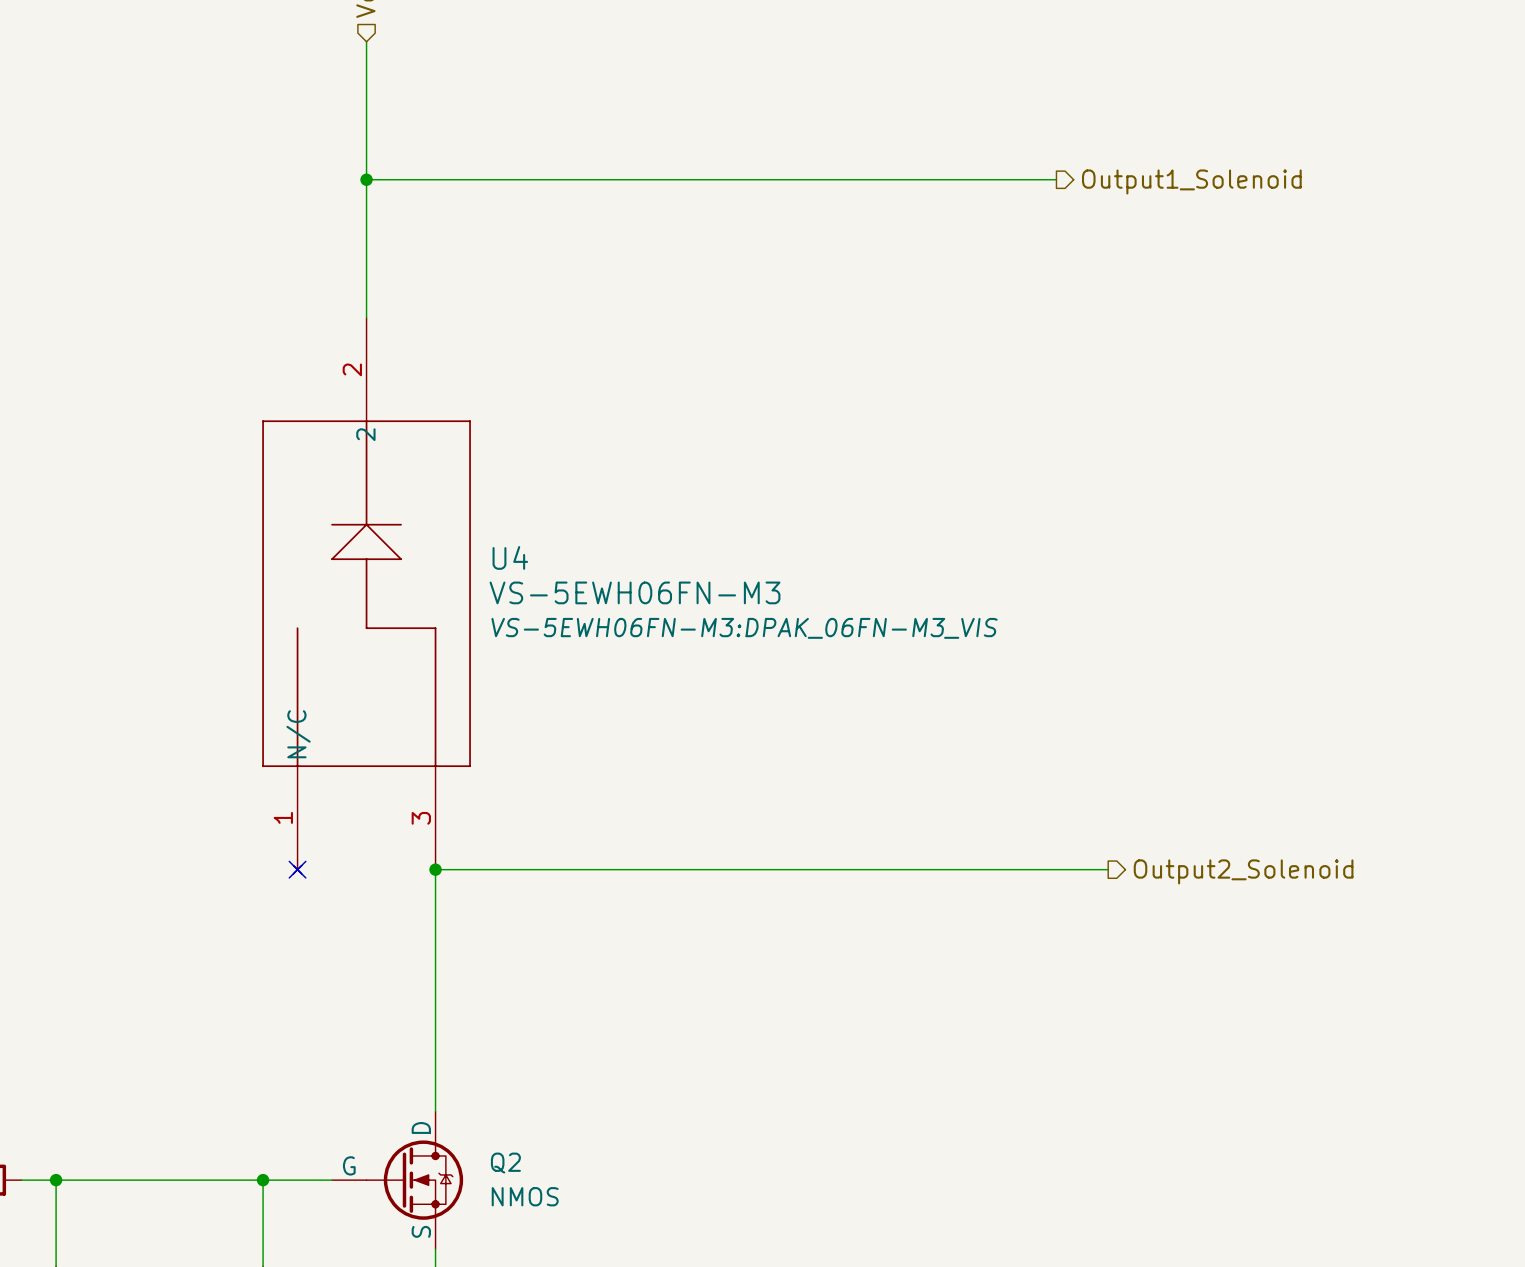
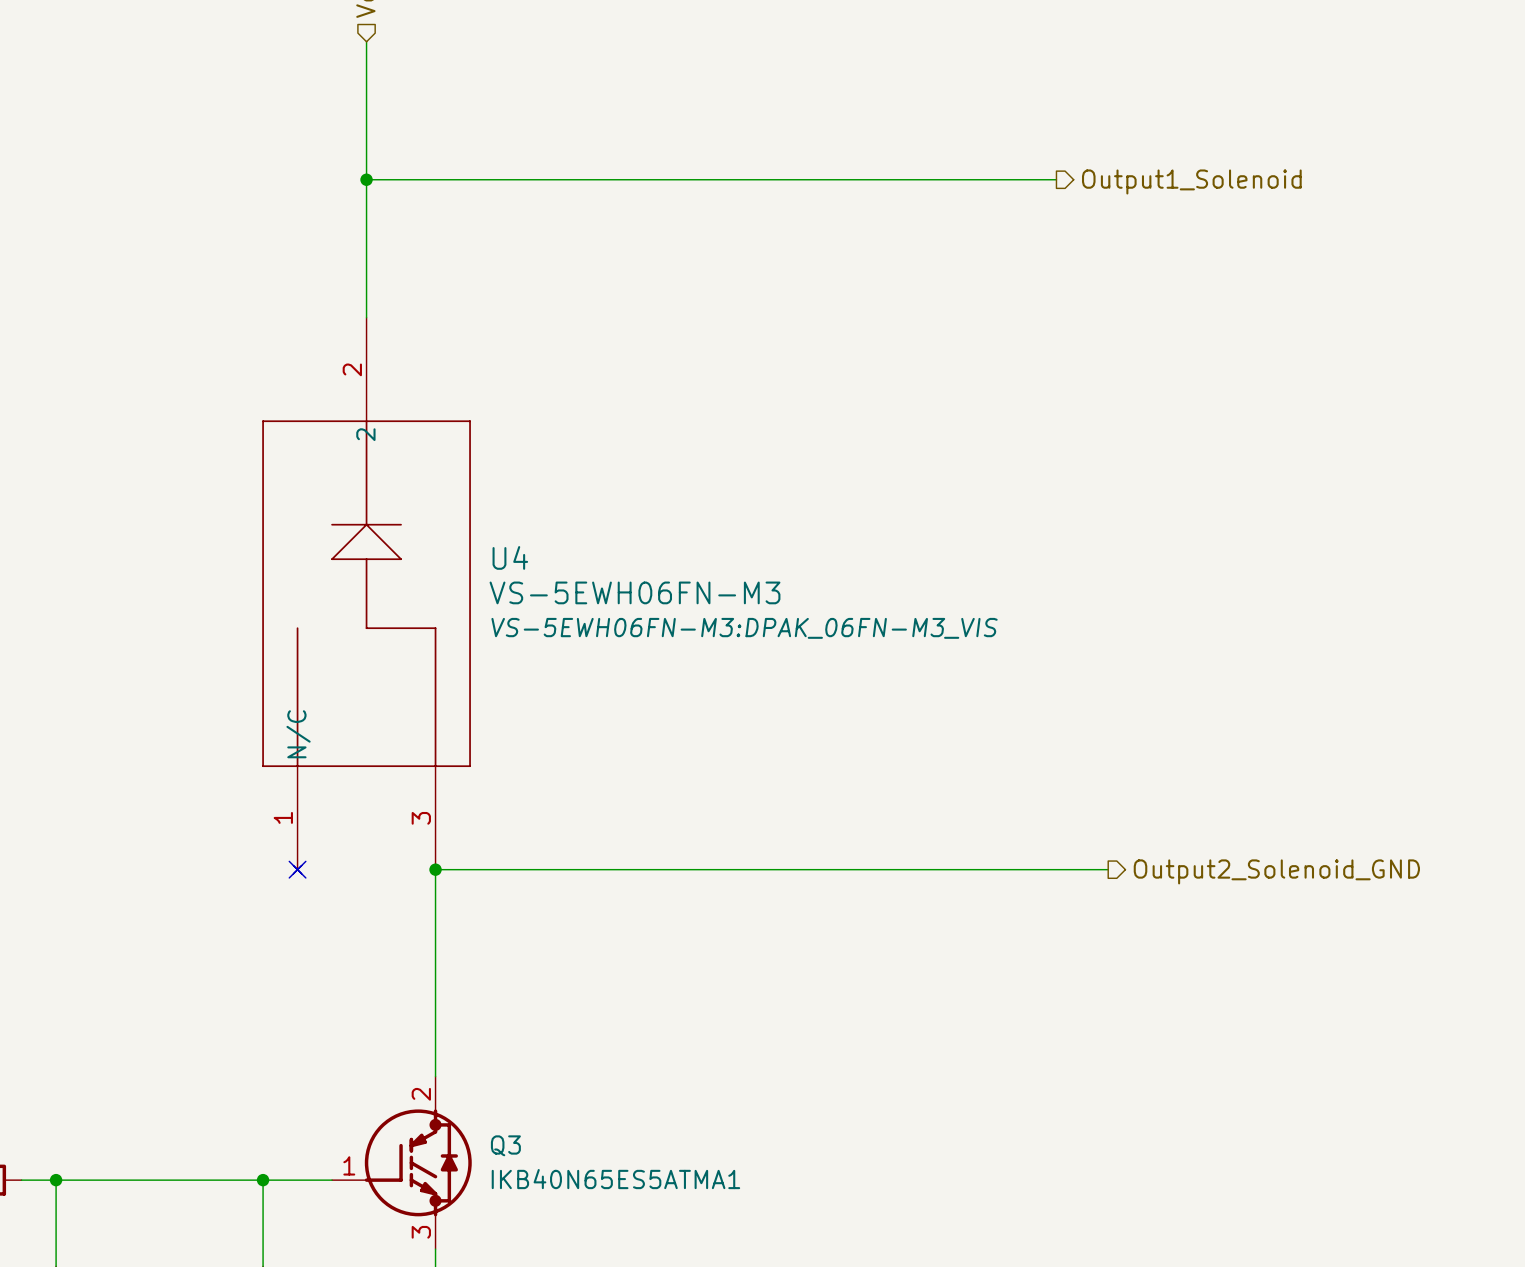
hierarchical label: Output2_Solenoid (1243, 871) -> Output2_Solenoid_GND (1276, 871)
Q3: none -> IKB40N65ES5ATMA1 (401, 1162)
Q2: NMOS (397, 1180) -> none

